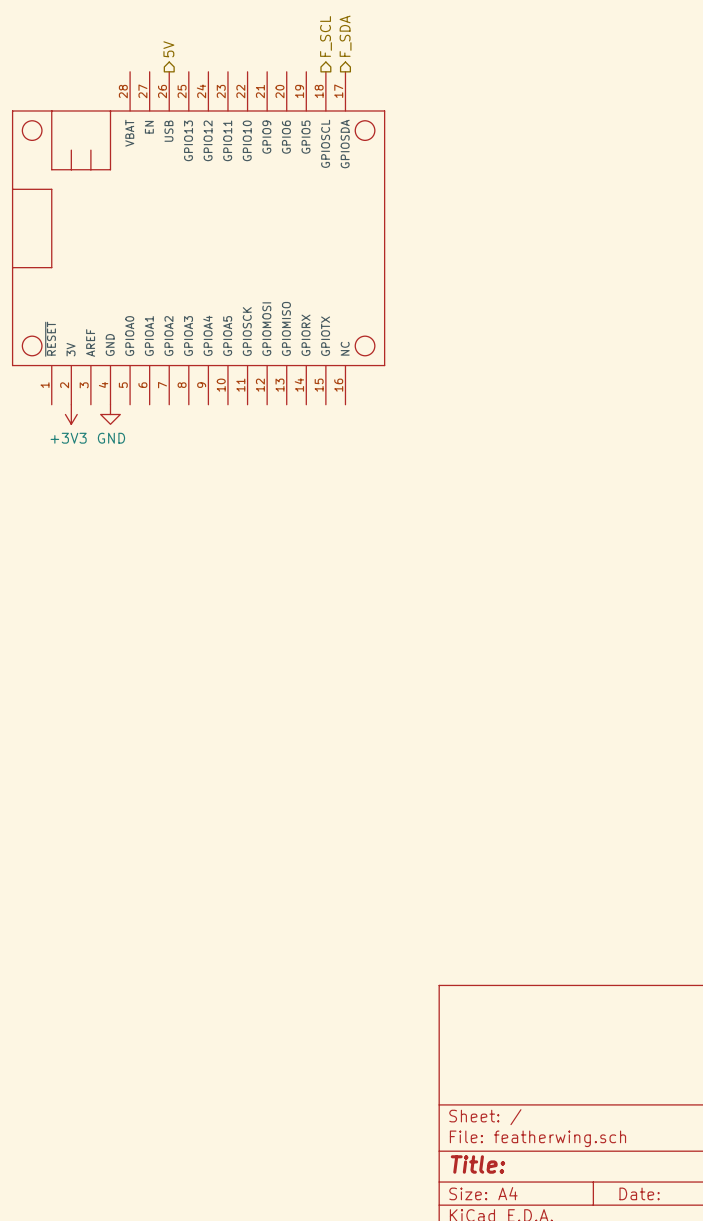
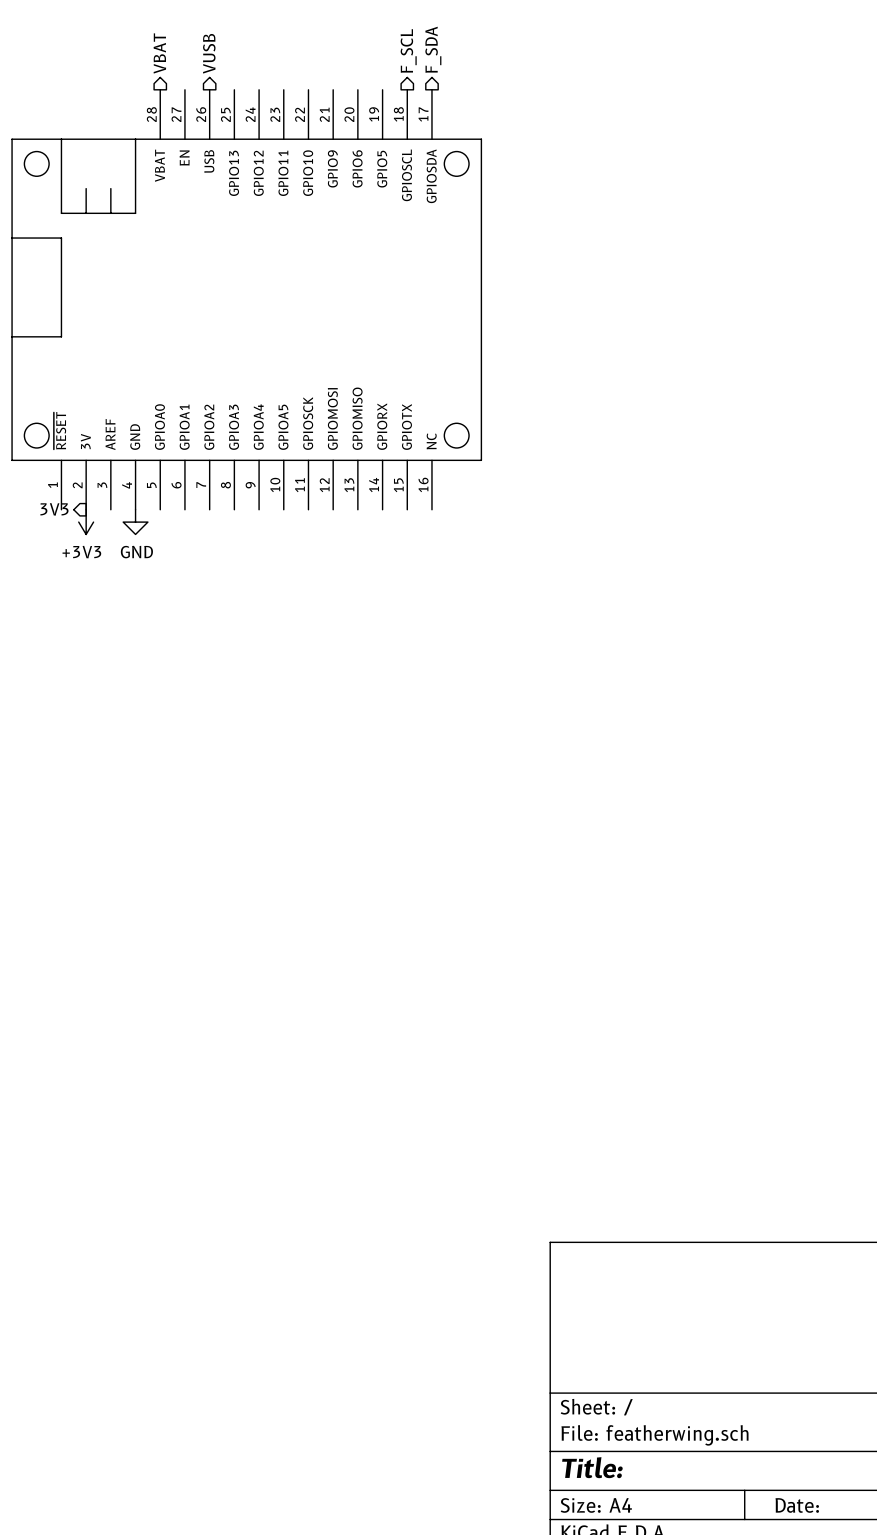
hierarchical label: none -> VBAT (159, 53)
hierarchical label: 5V (168, 49) -> VUSB (209, 53)
hierarchical label: none -> 3V3 (54, 509)

